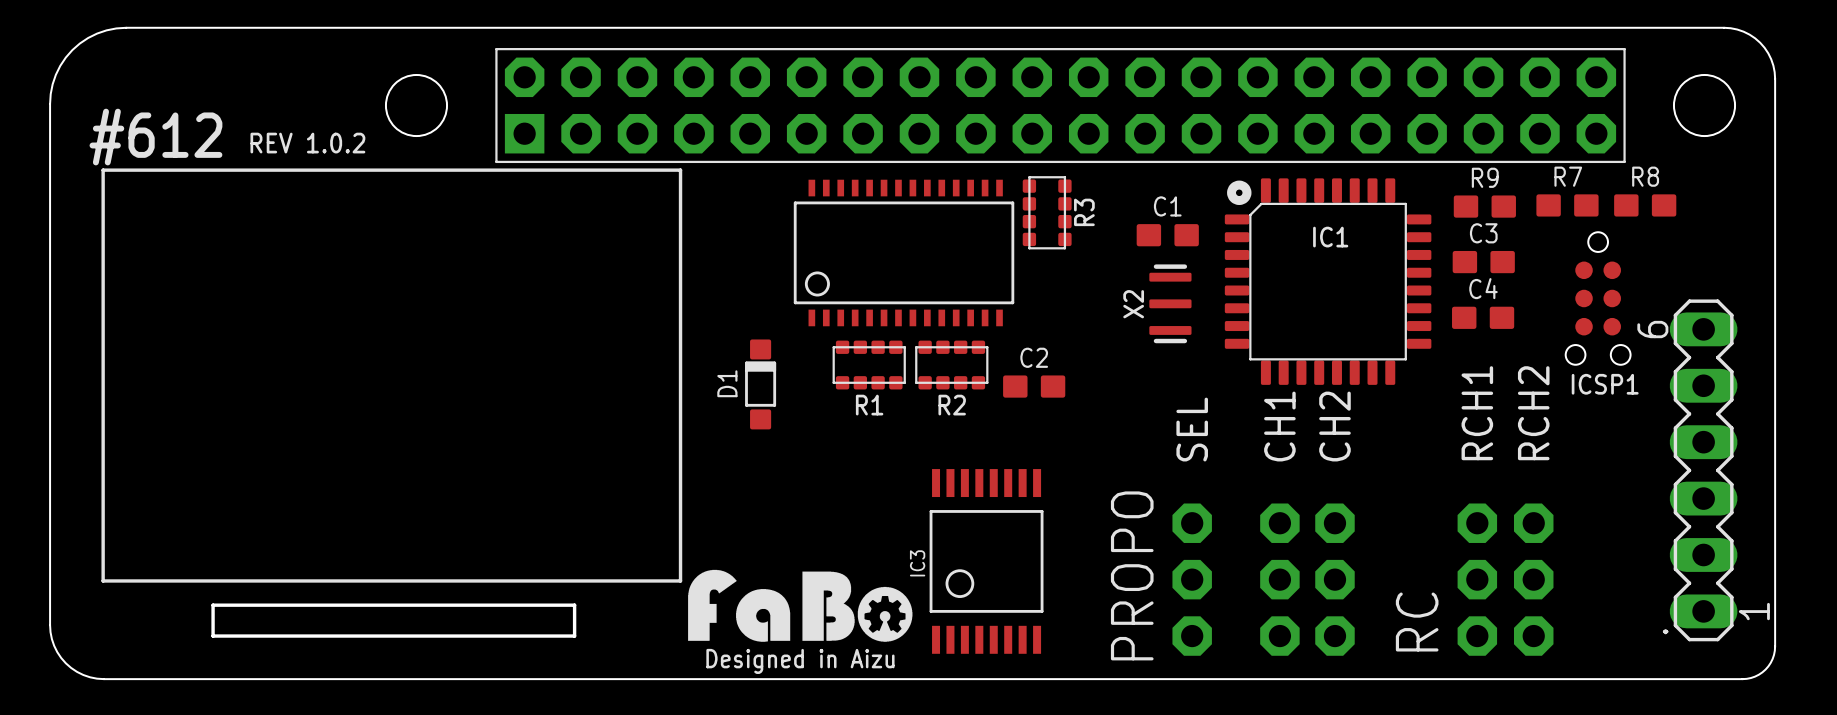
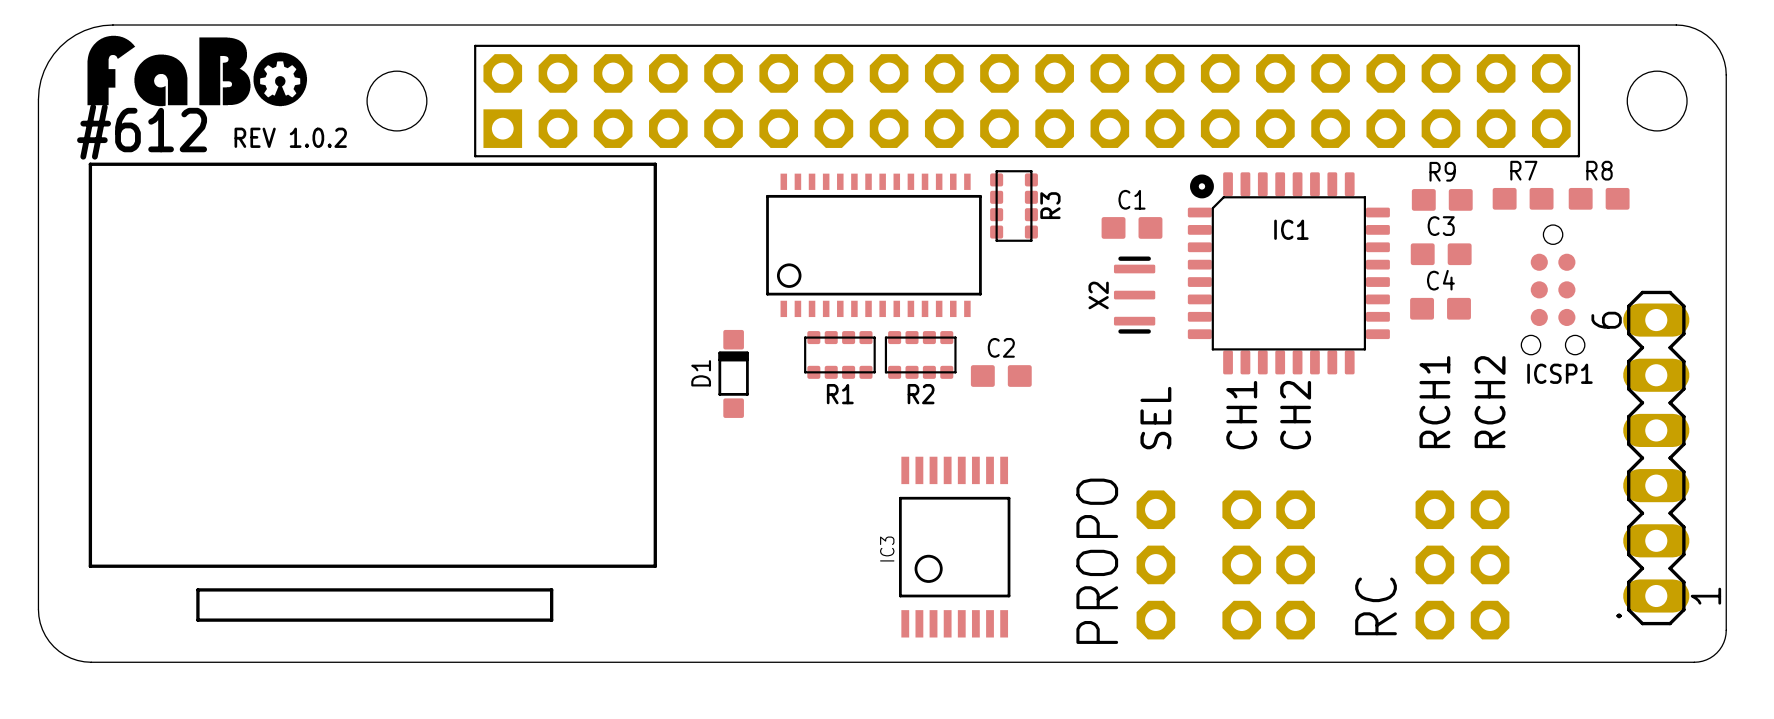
drawing: none -> [87, 35, 308, 107]
drawing: [688, 569, 913, 642] -> none
text: Designed in Aizu (800, 661) -> none

